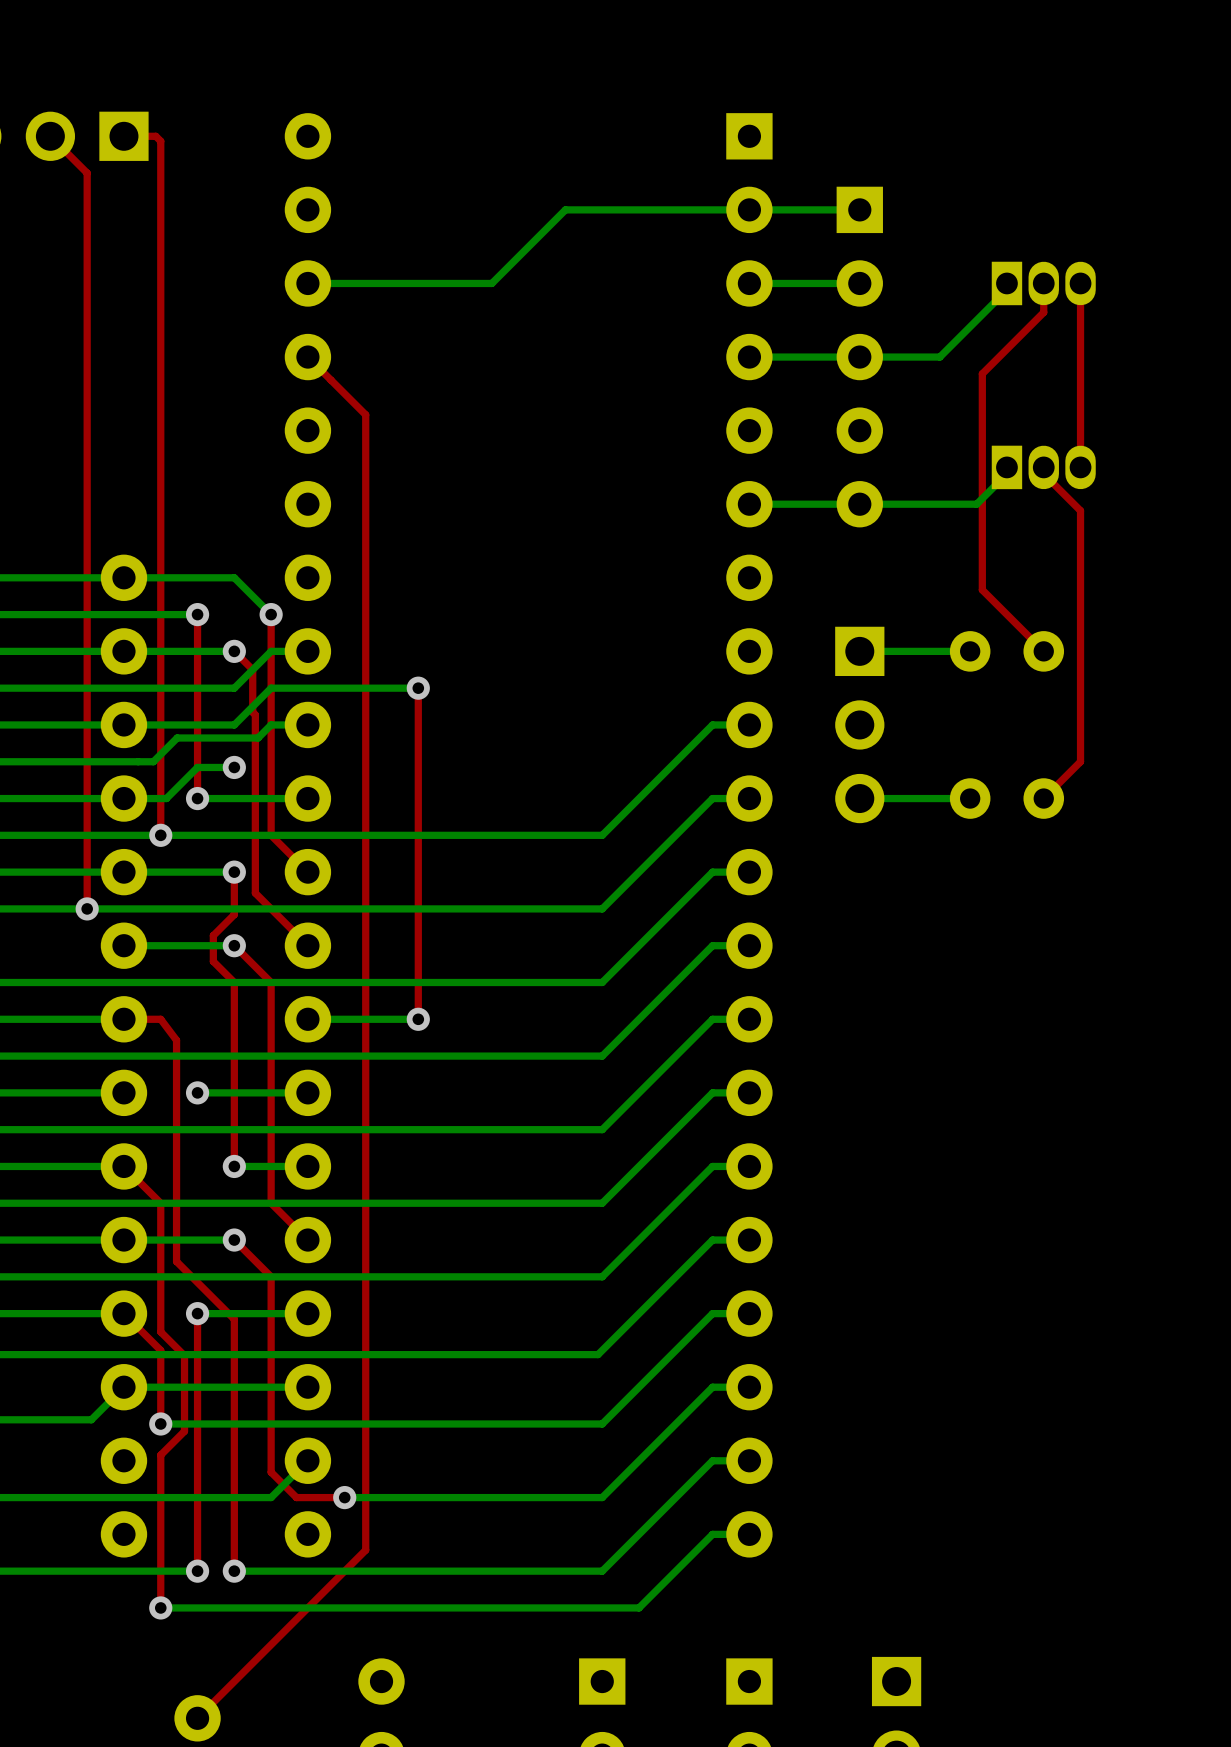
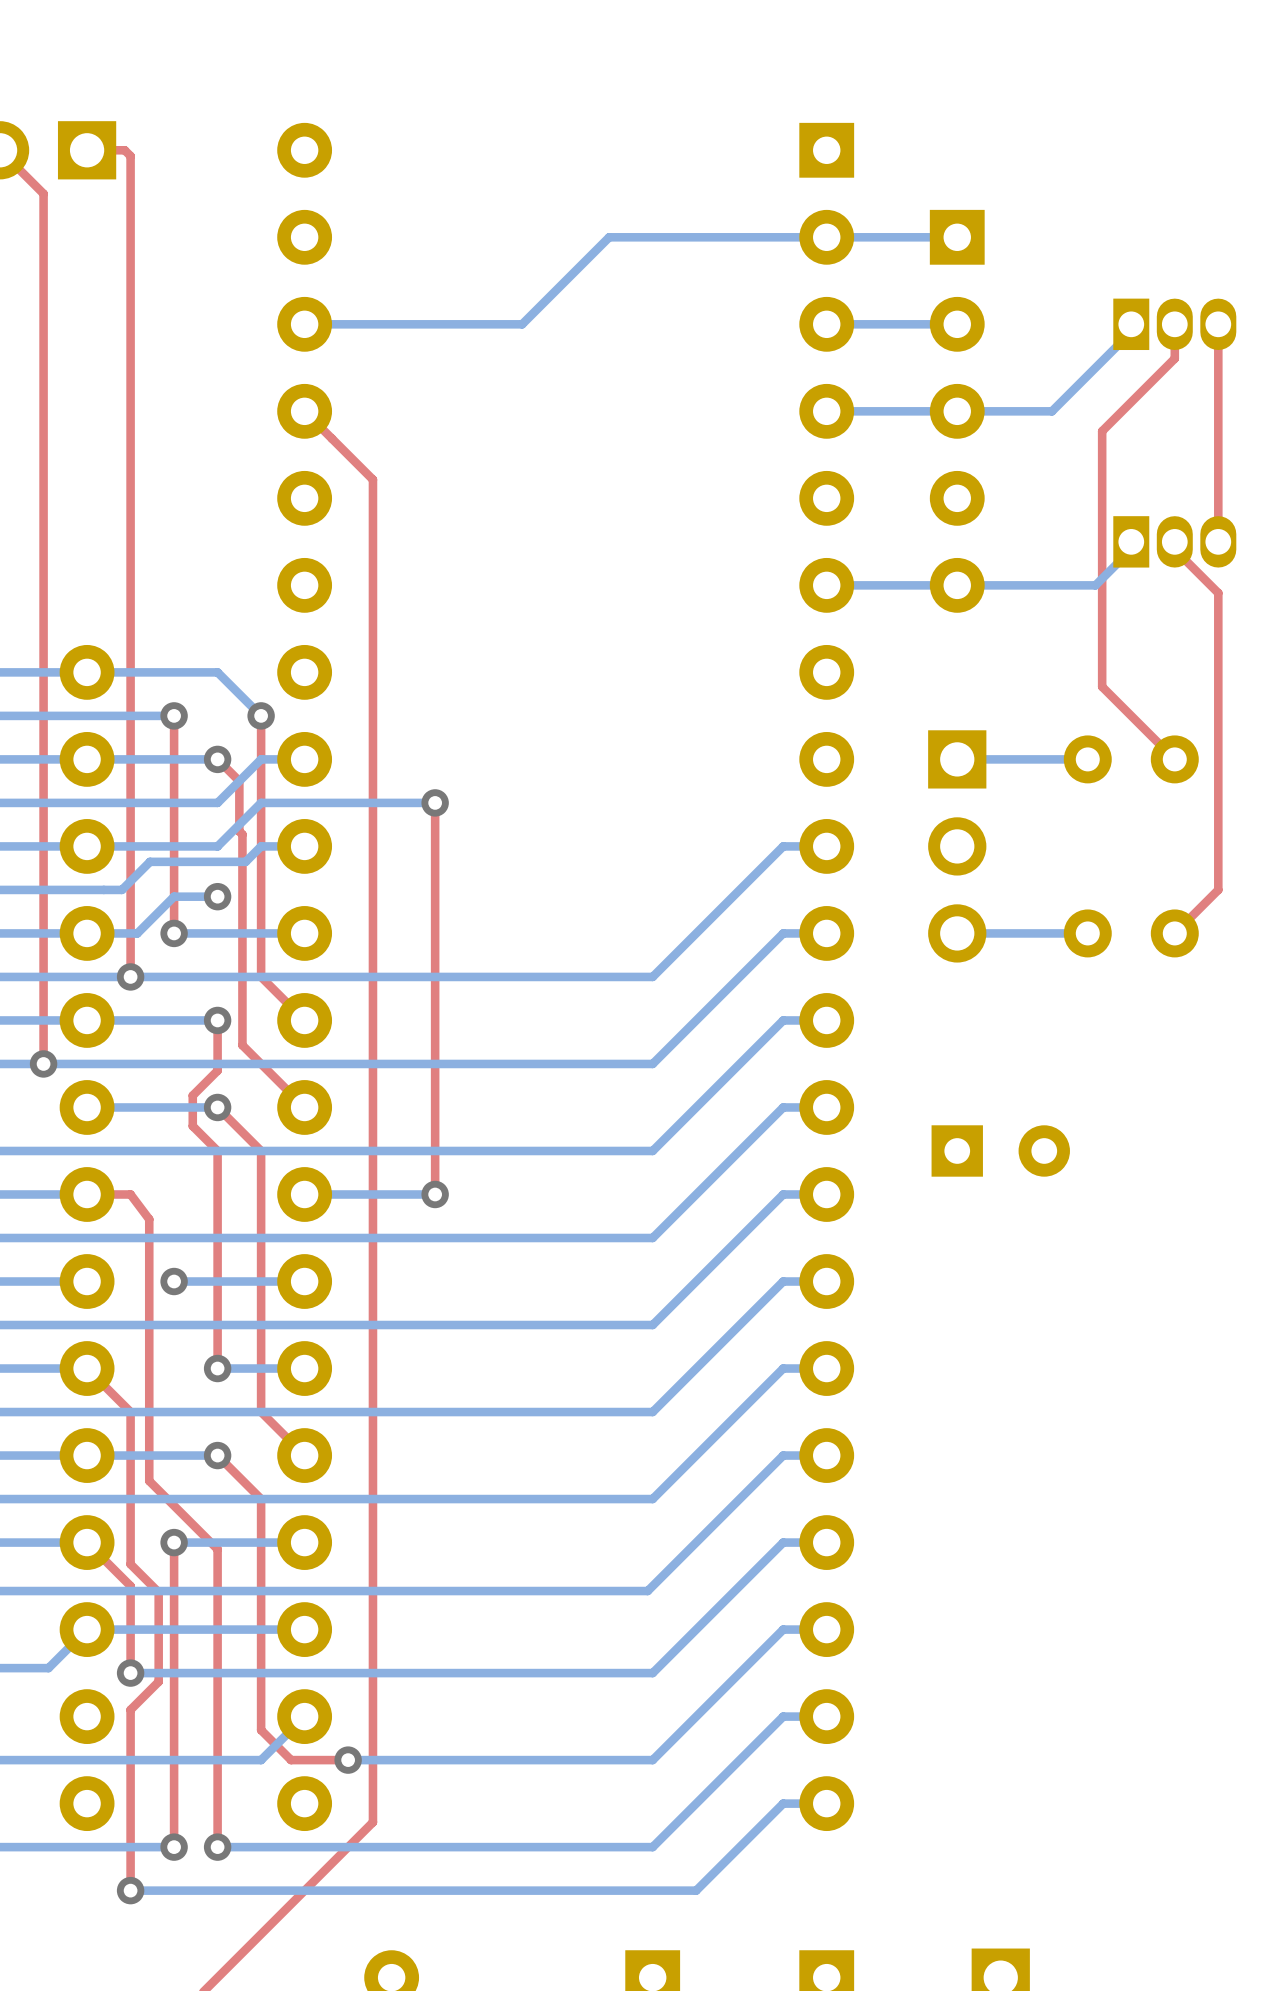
part: none -> (1000, 1150)

